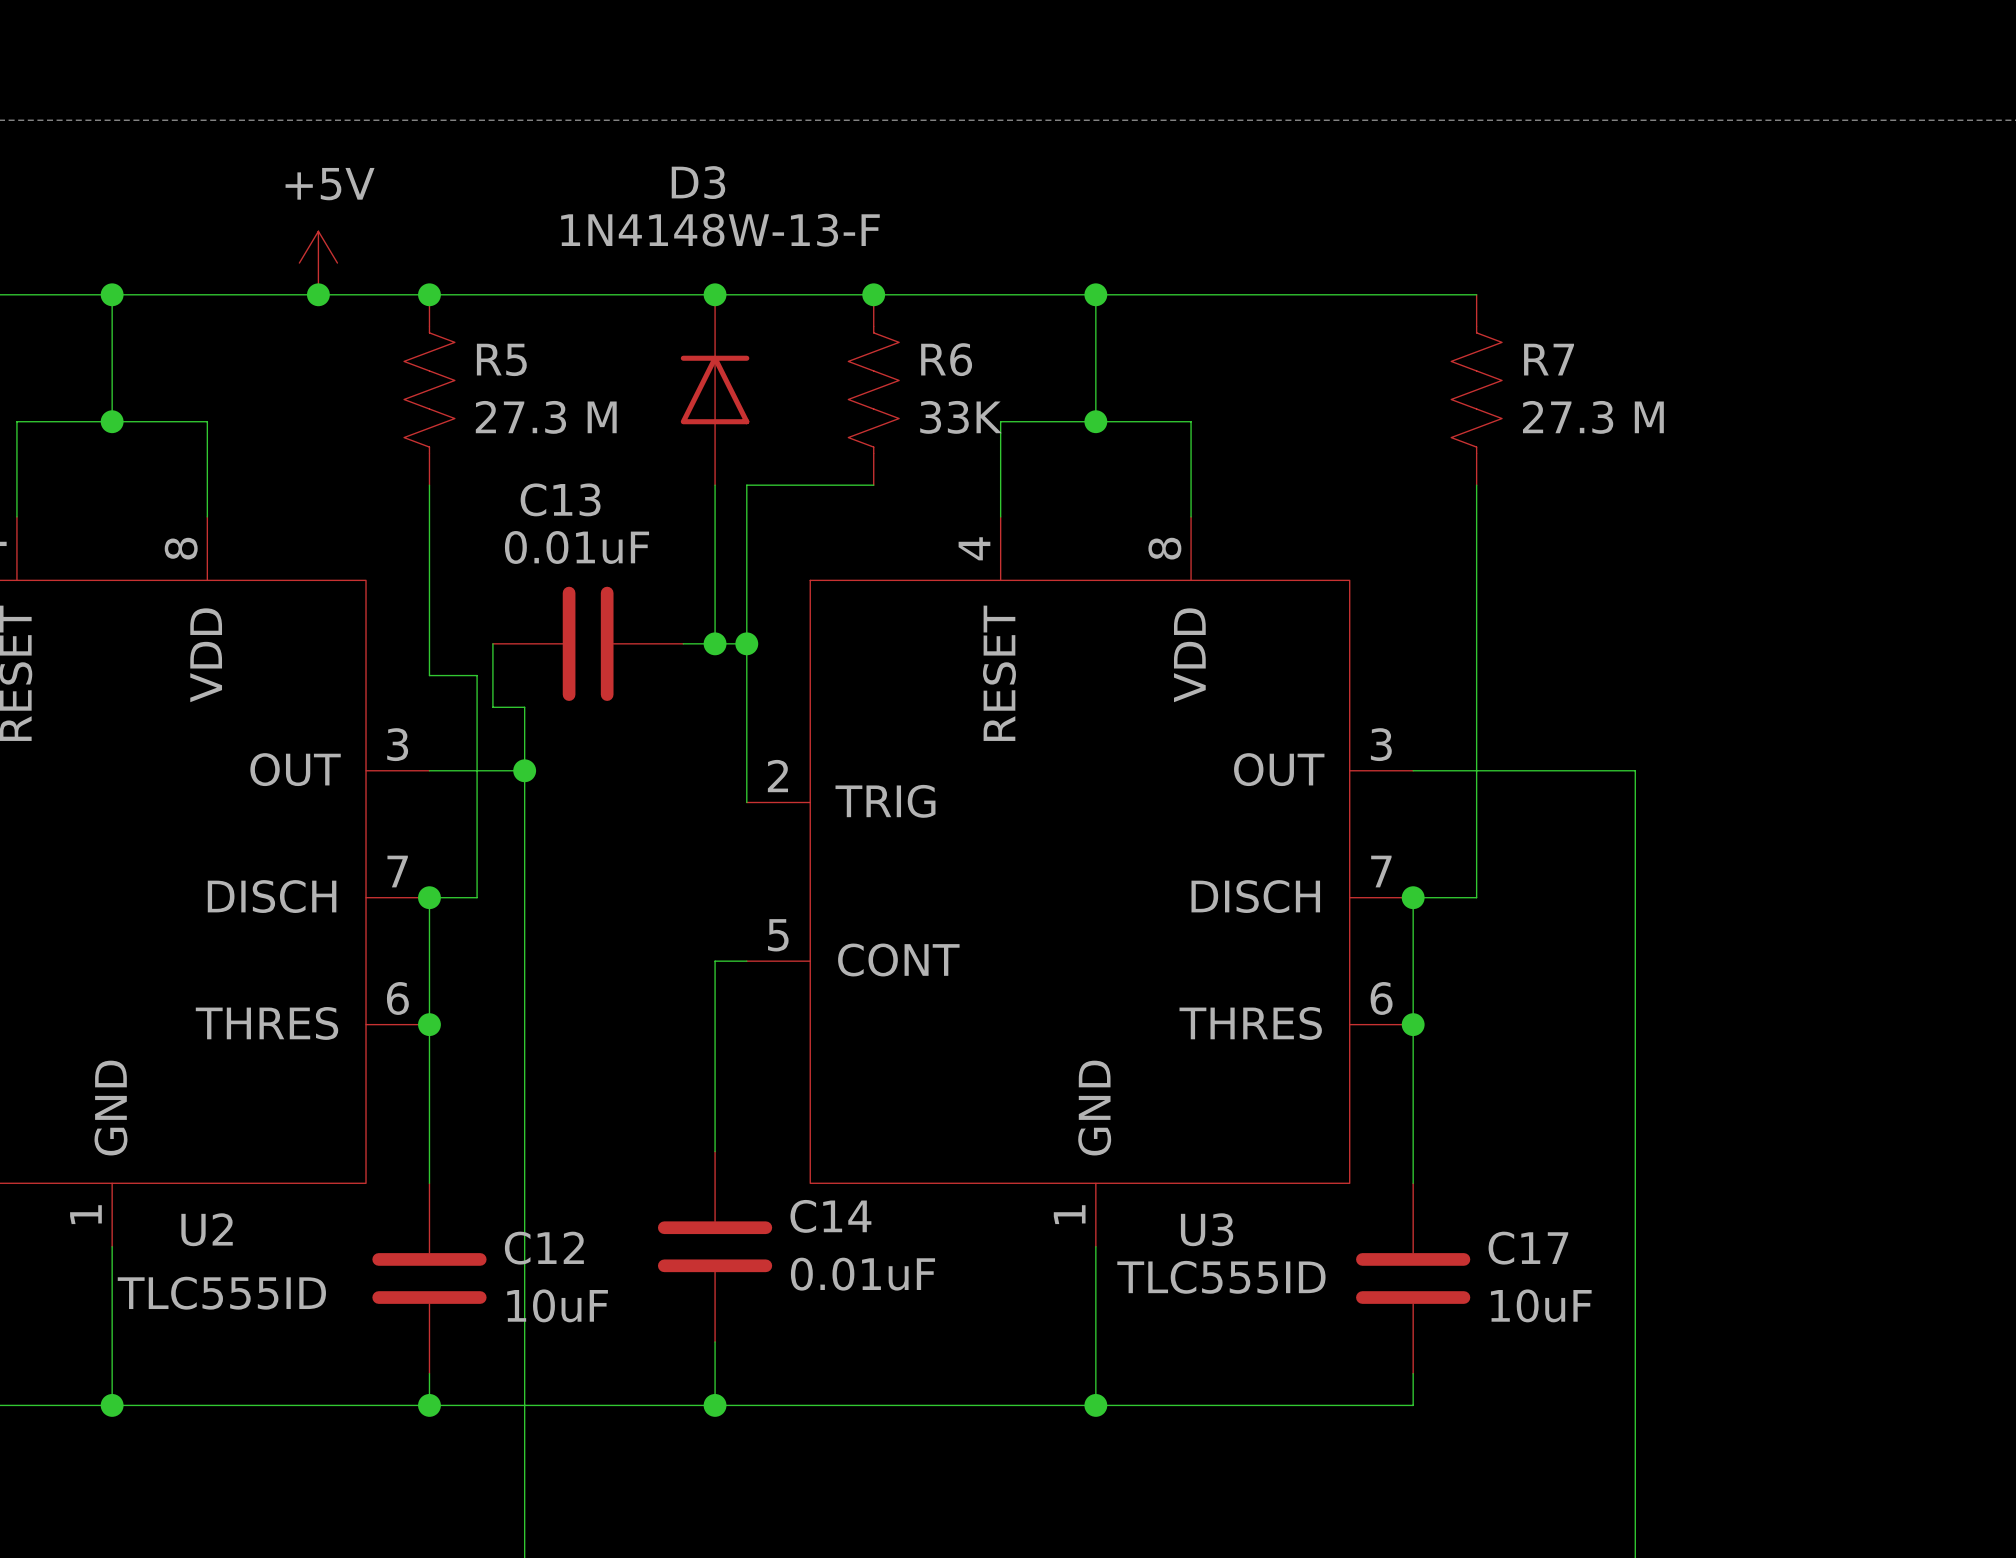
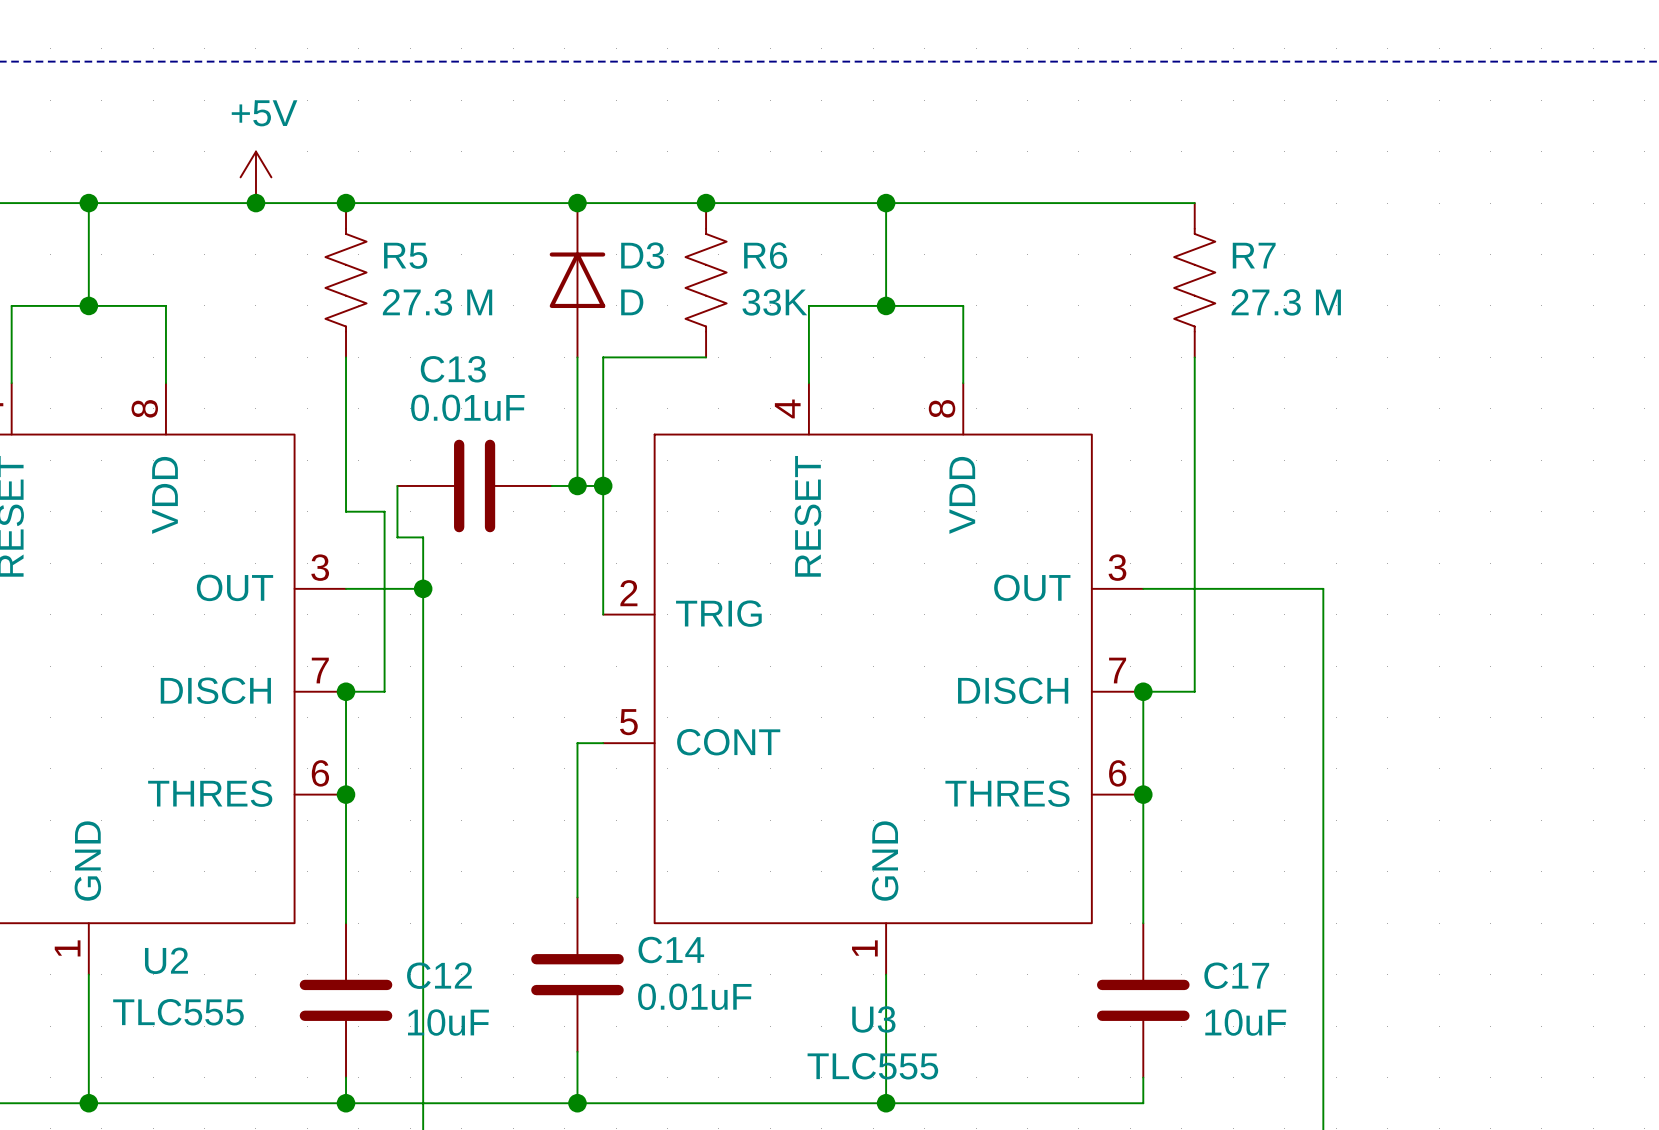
D3 name position: D3 (698, 182) -> D3 (642, 255)
D3 value: 1N4148W-13-F (720, 230) -> D (632, 302)
U3 name position: U3 (1207, 1229) -> U3 (873, 1019)
U3 value: TLC555ID (1221, 1277) -> TLC555 (872, 1066)
U2 value: TLC555ID (221, 1293) -> TLC555 (178, 1012)

